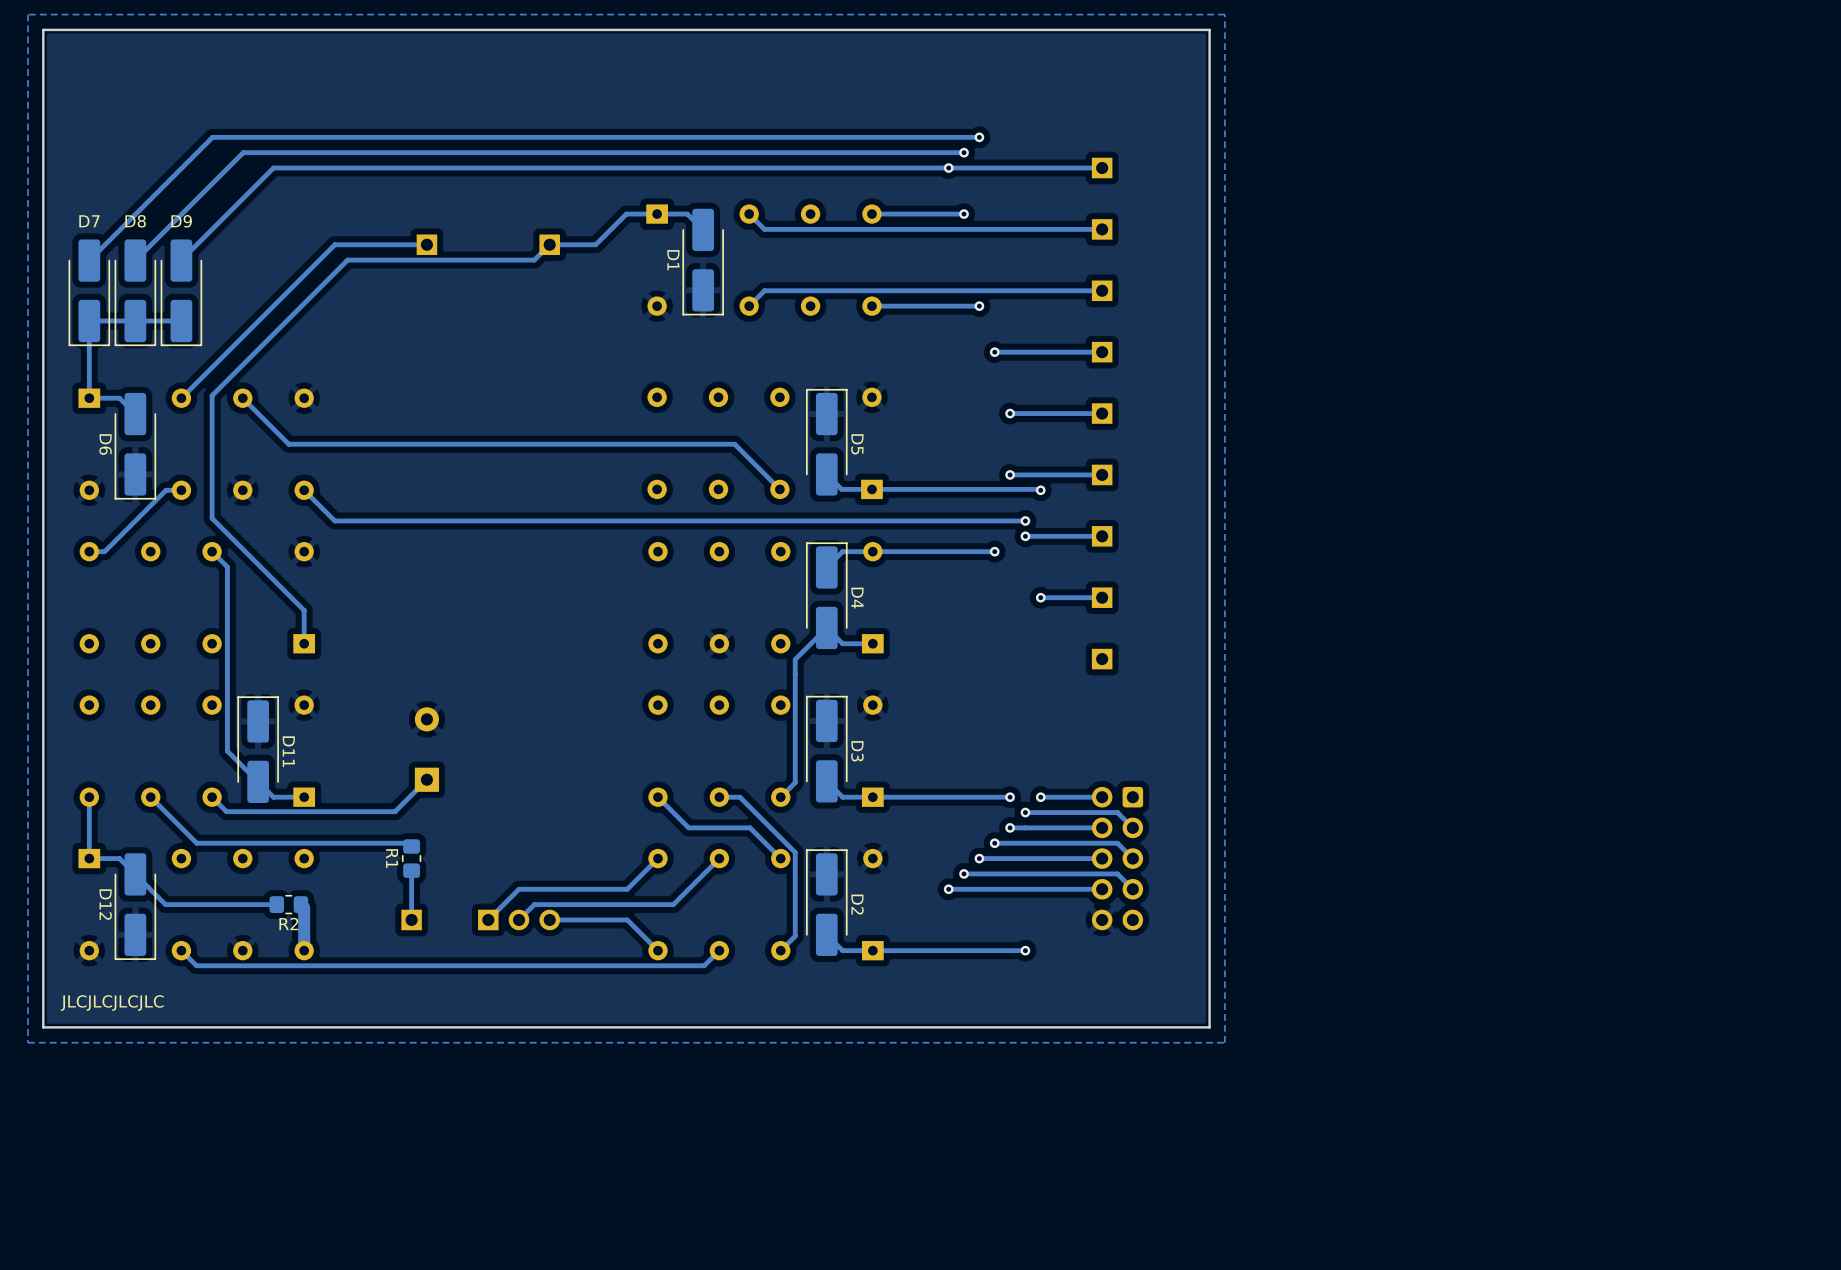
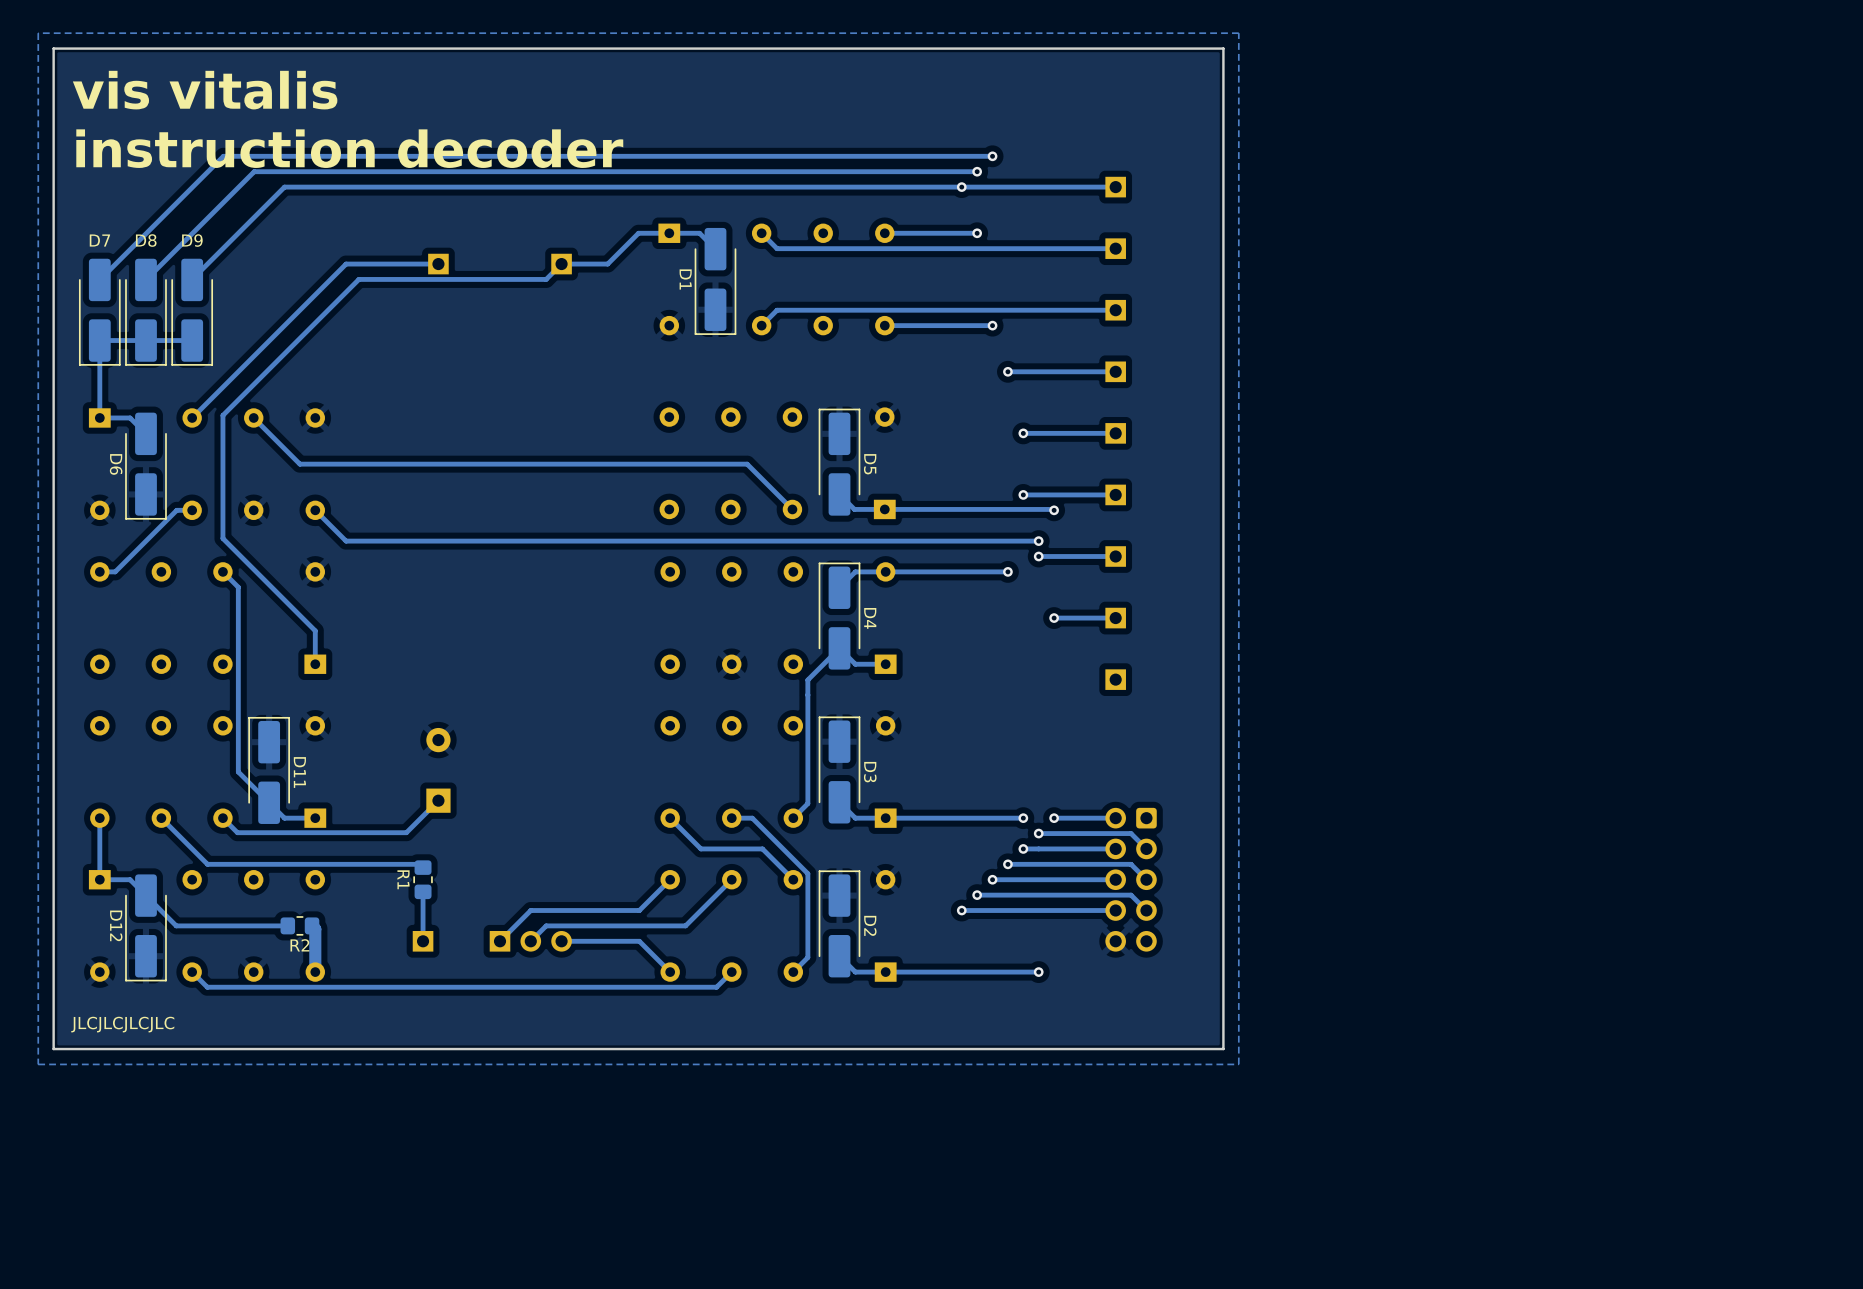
text: none -> vis vitalis (205, 90)
text: none -> instruction decoder (349, 148)

